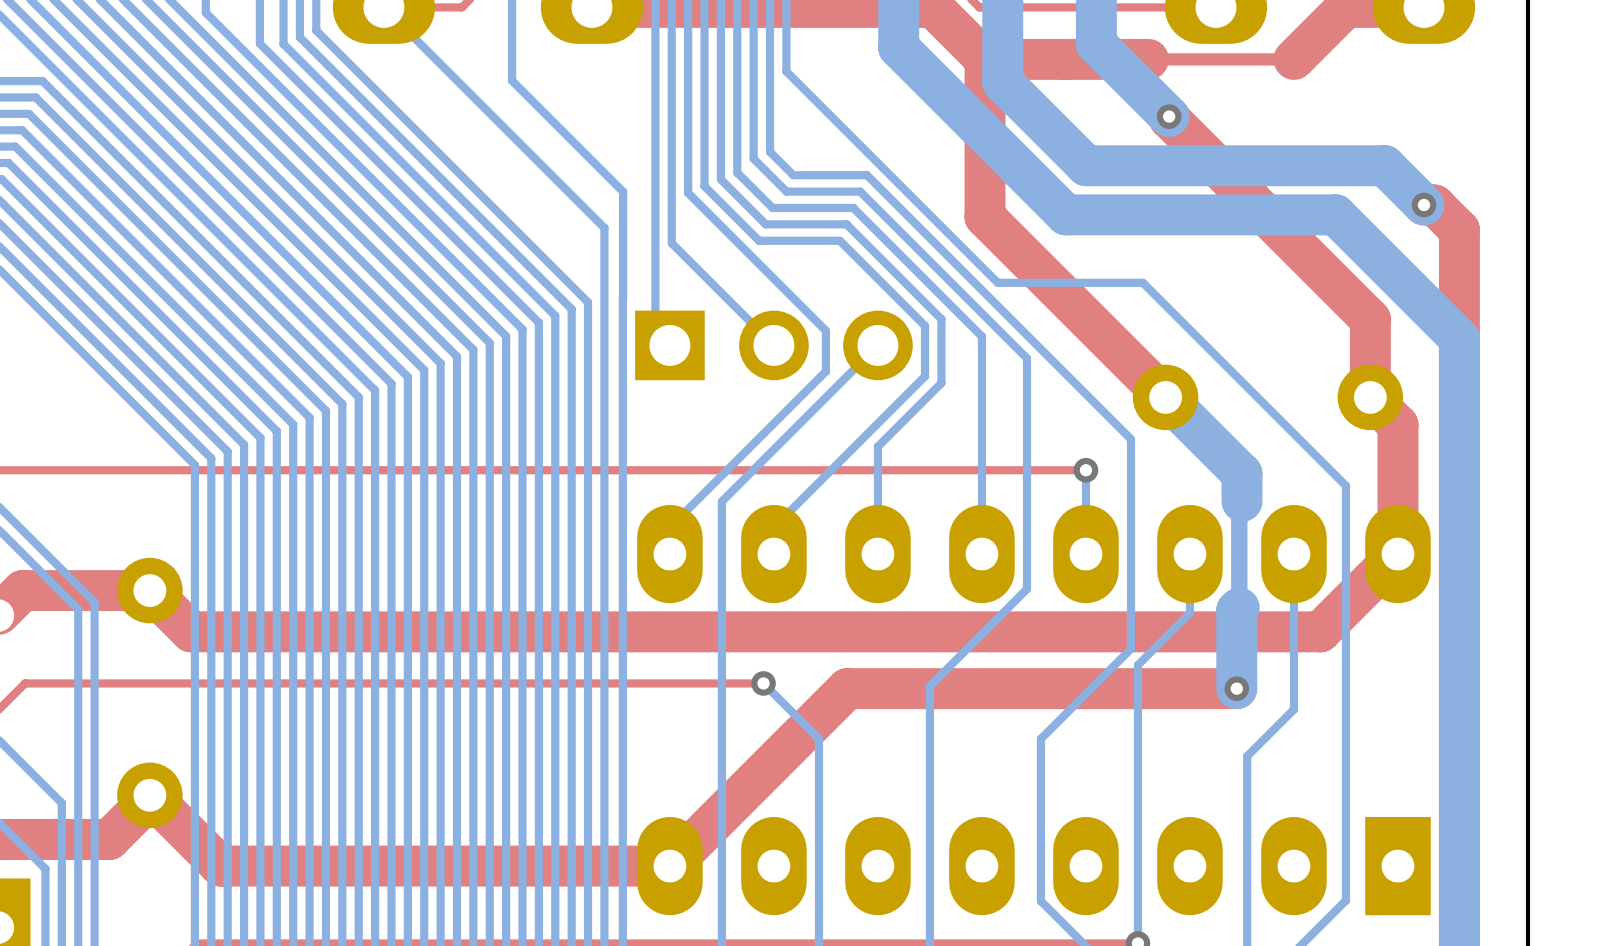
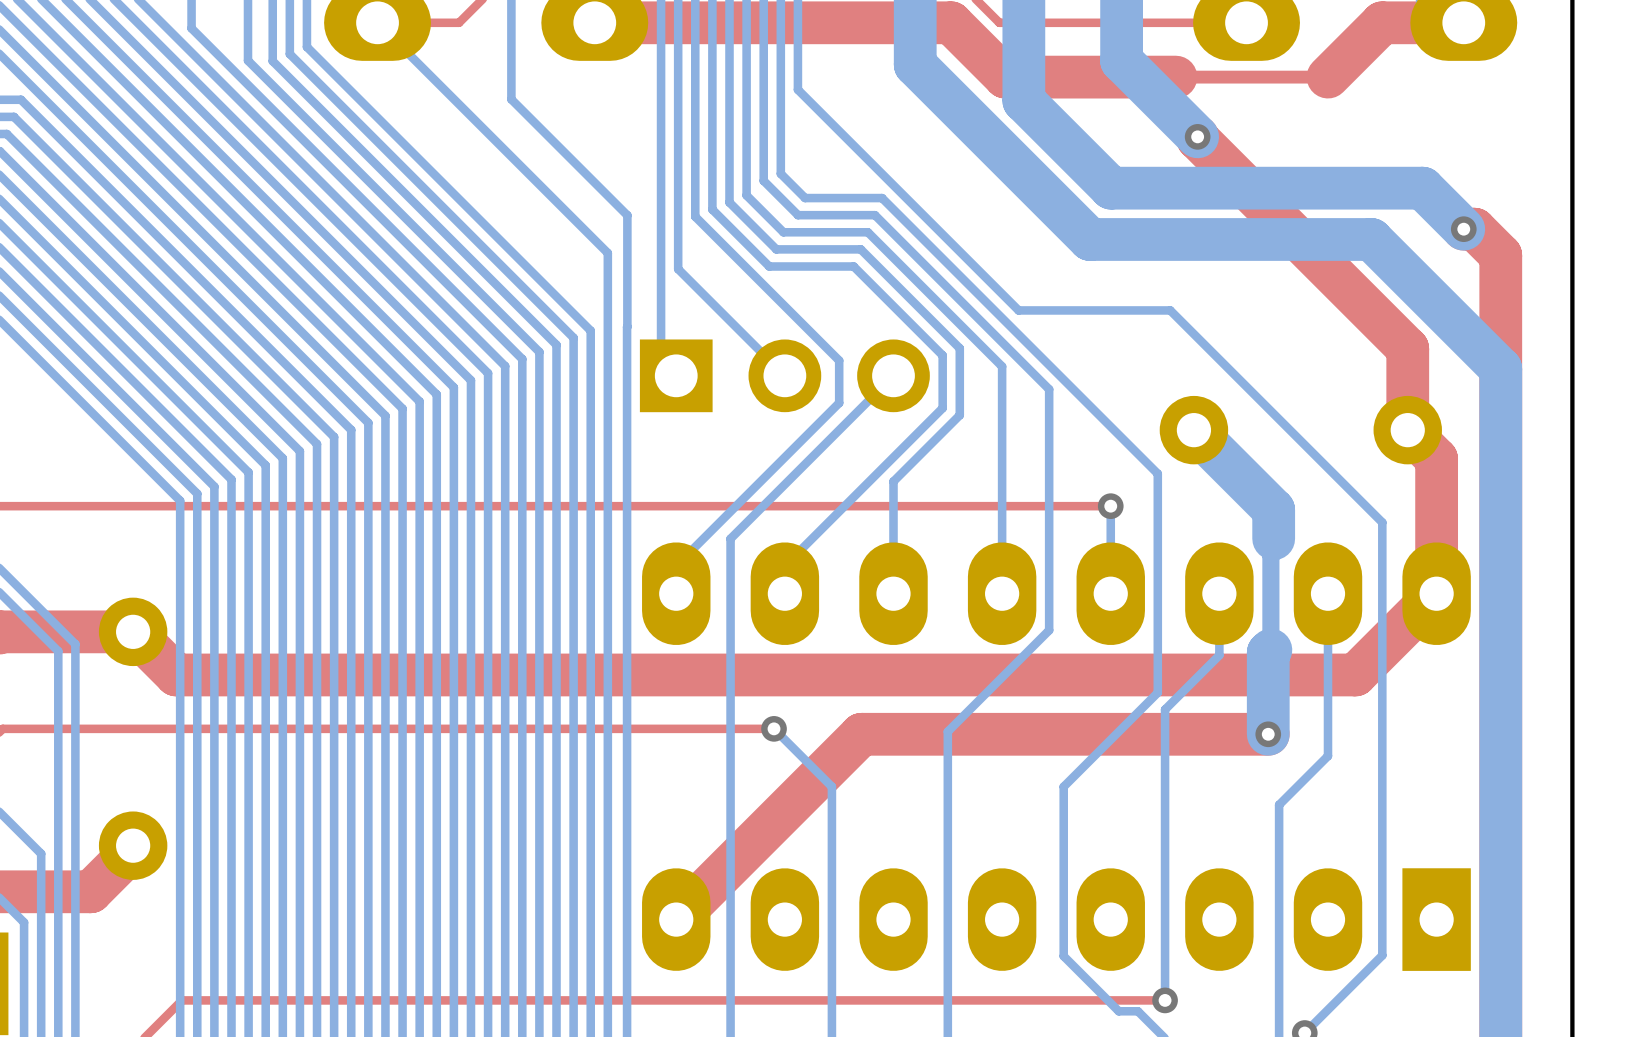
top track: (985, 59) (985, 216) (1165, 397) -> none
top track: (149, 795) (220, 866) (669, 866) -> none

